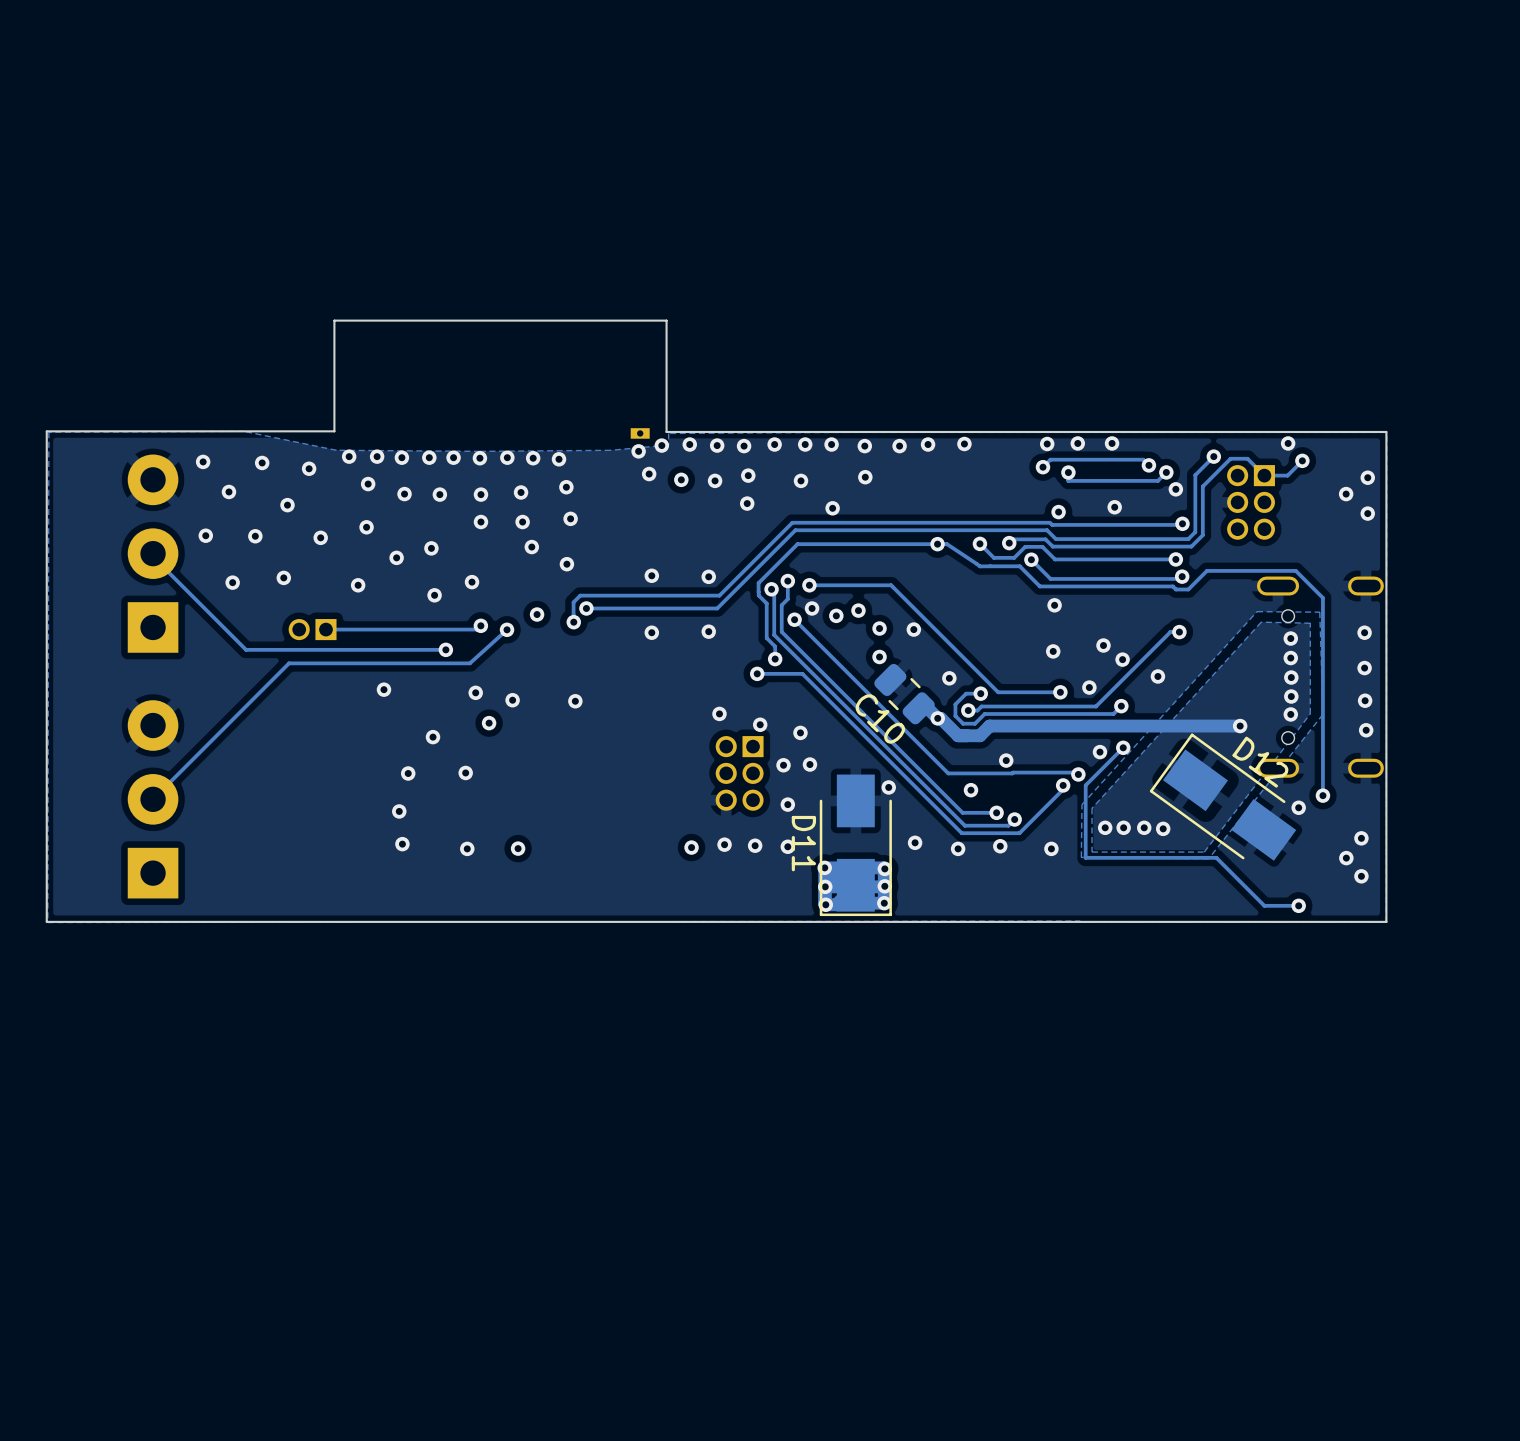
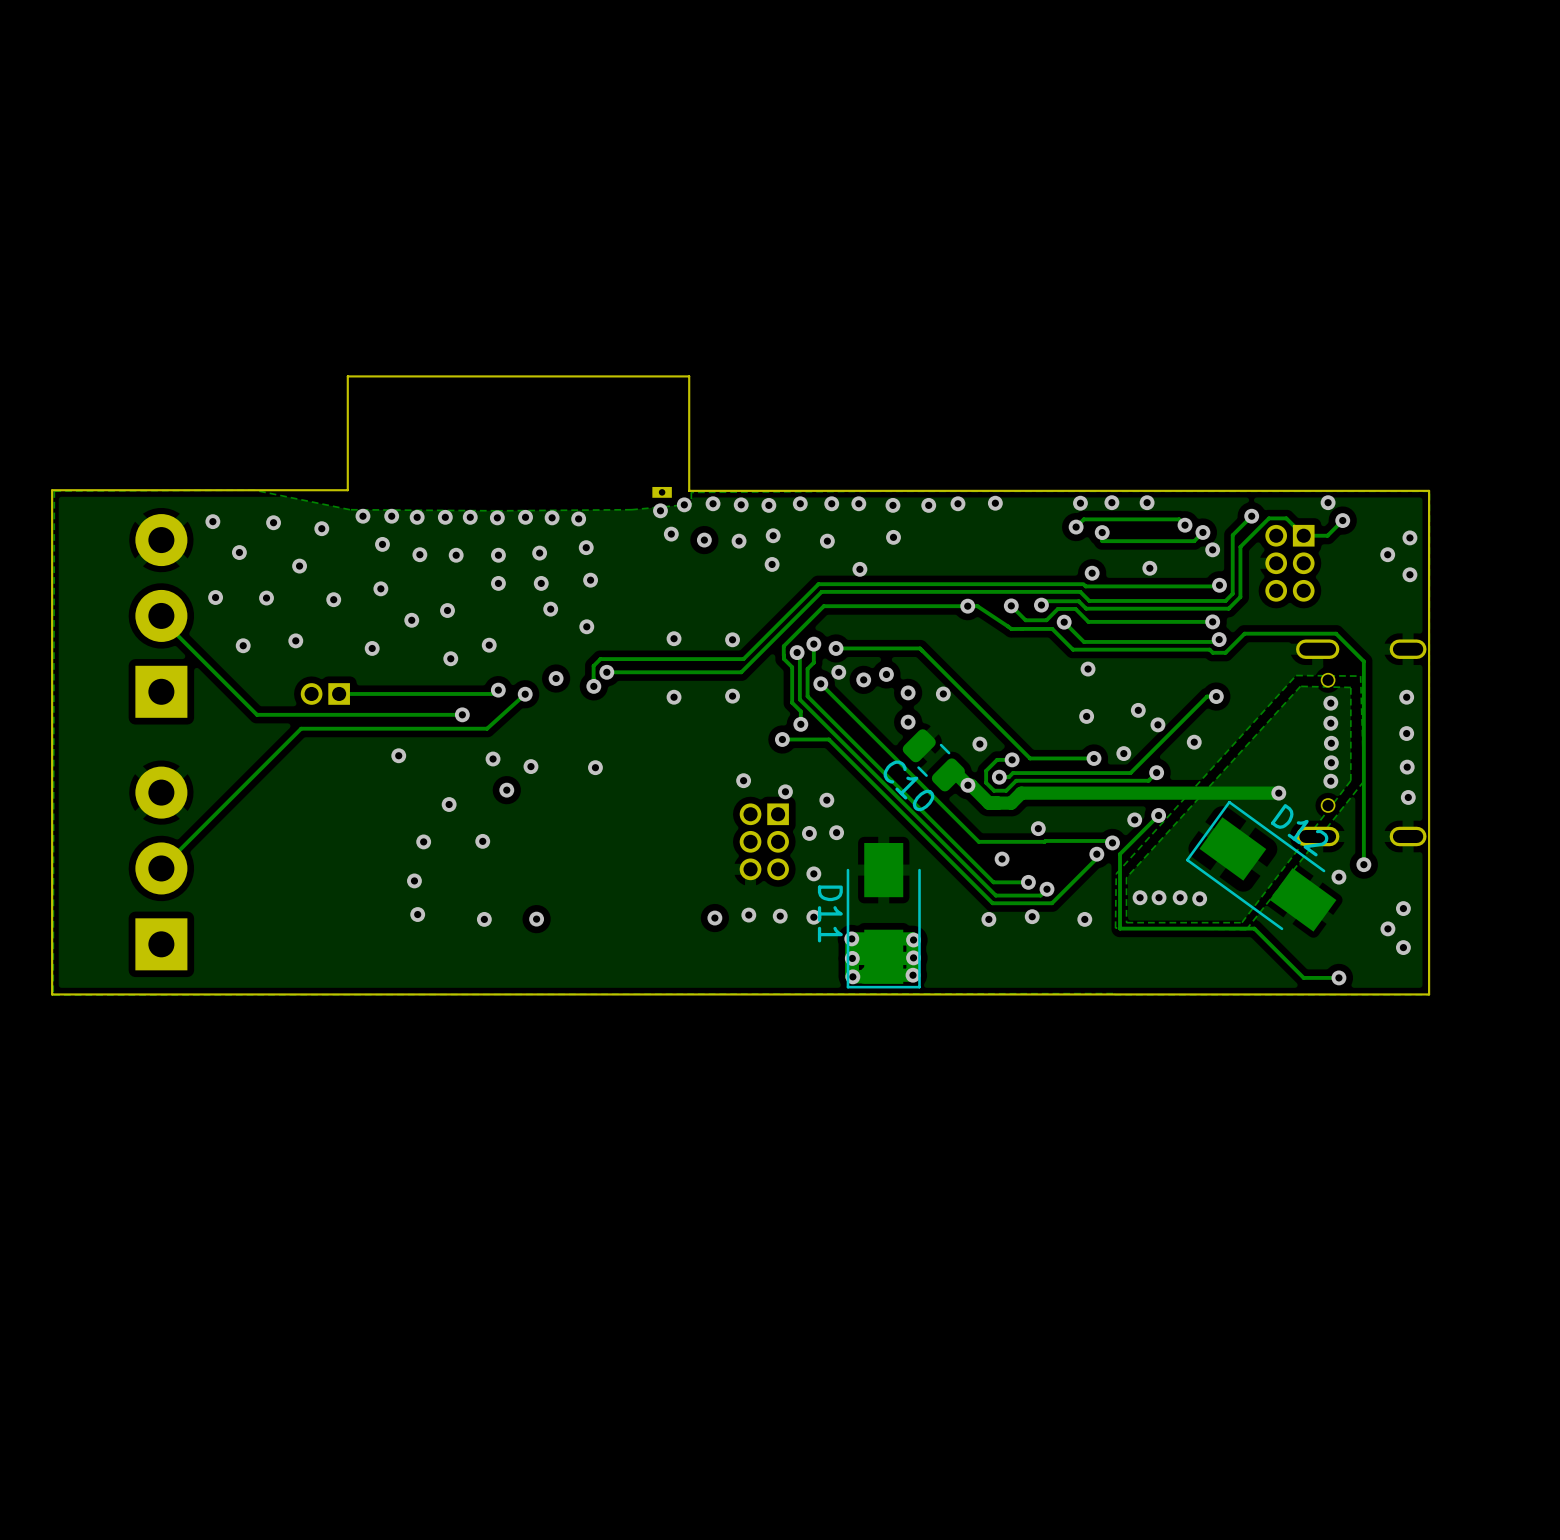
via: (888, 787) -> none
via: (915, 842) -> none

